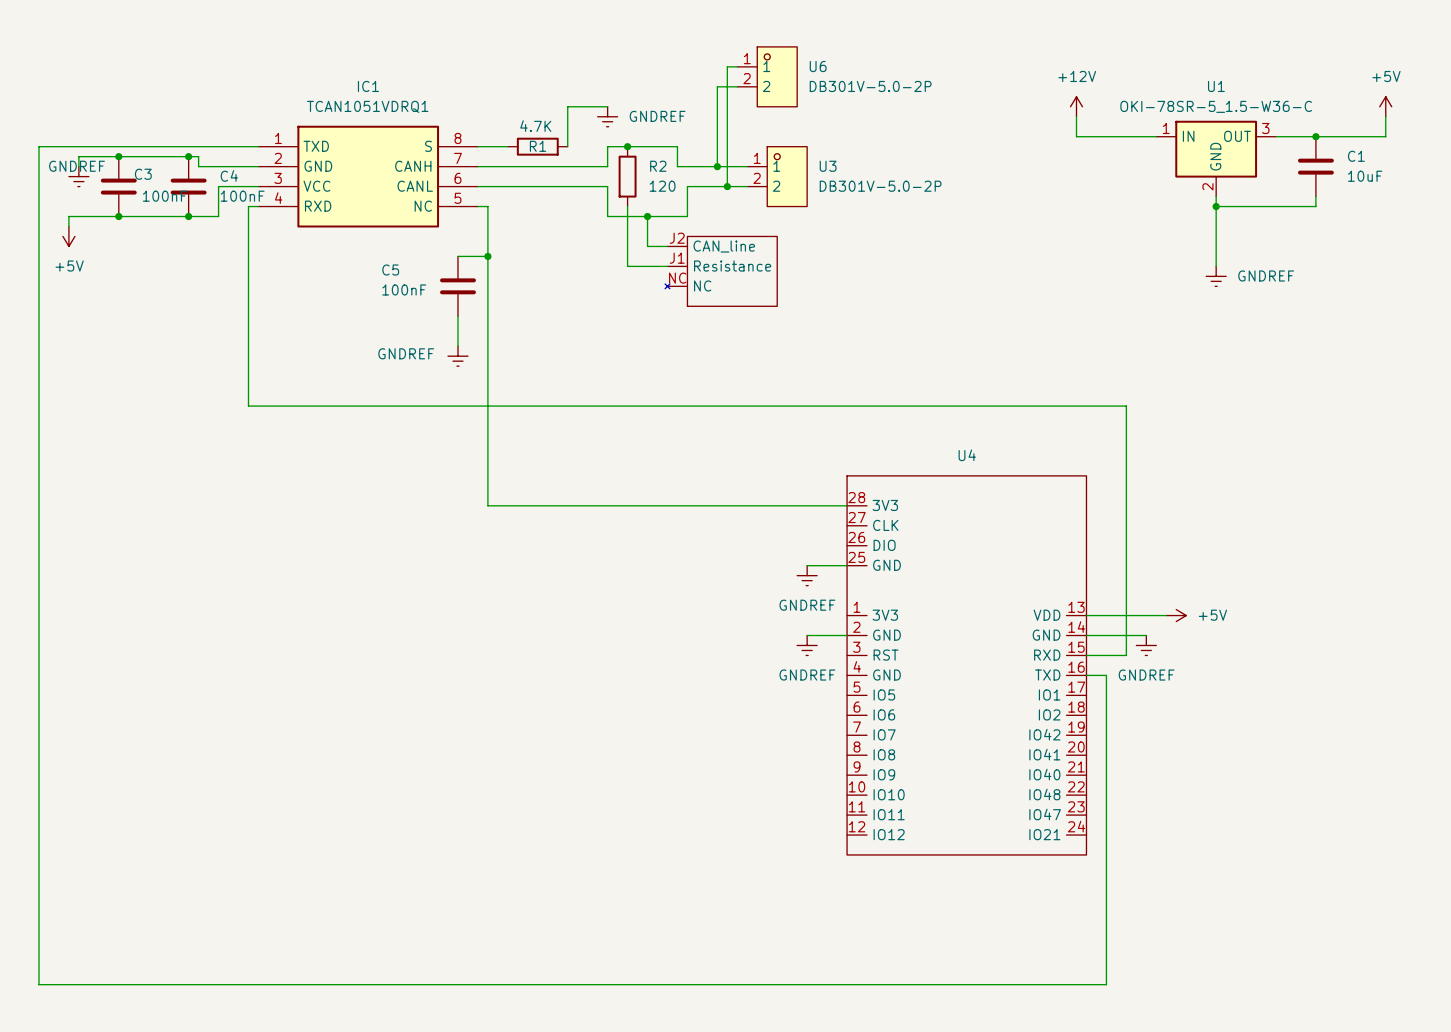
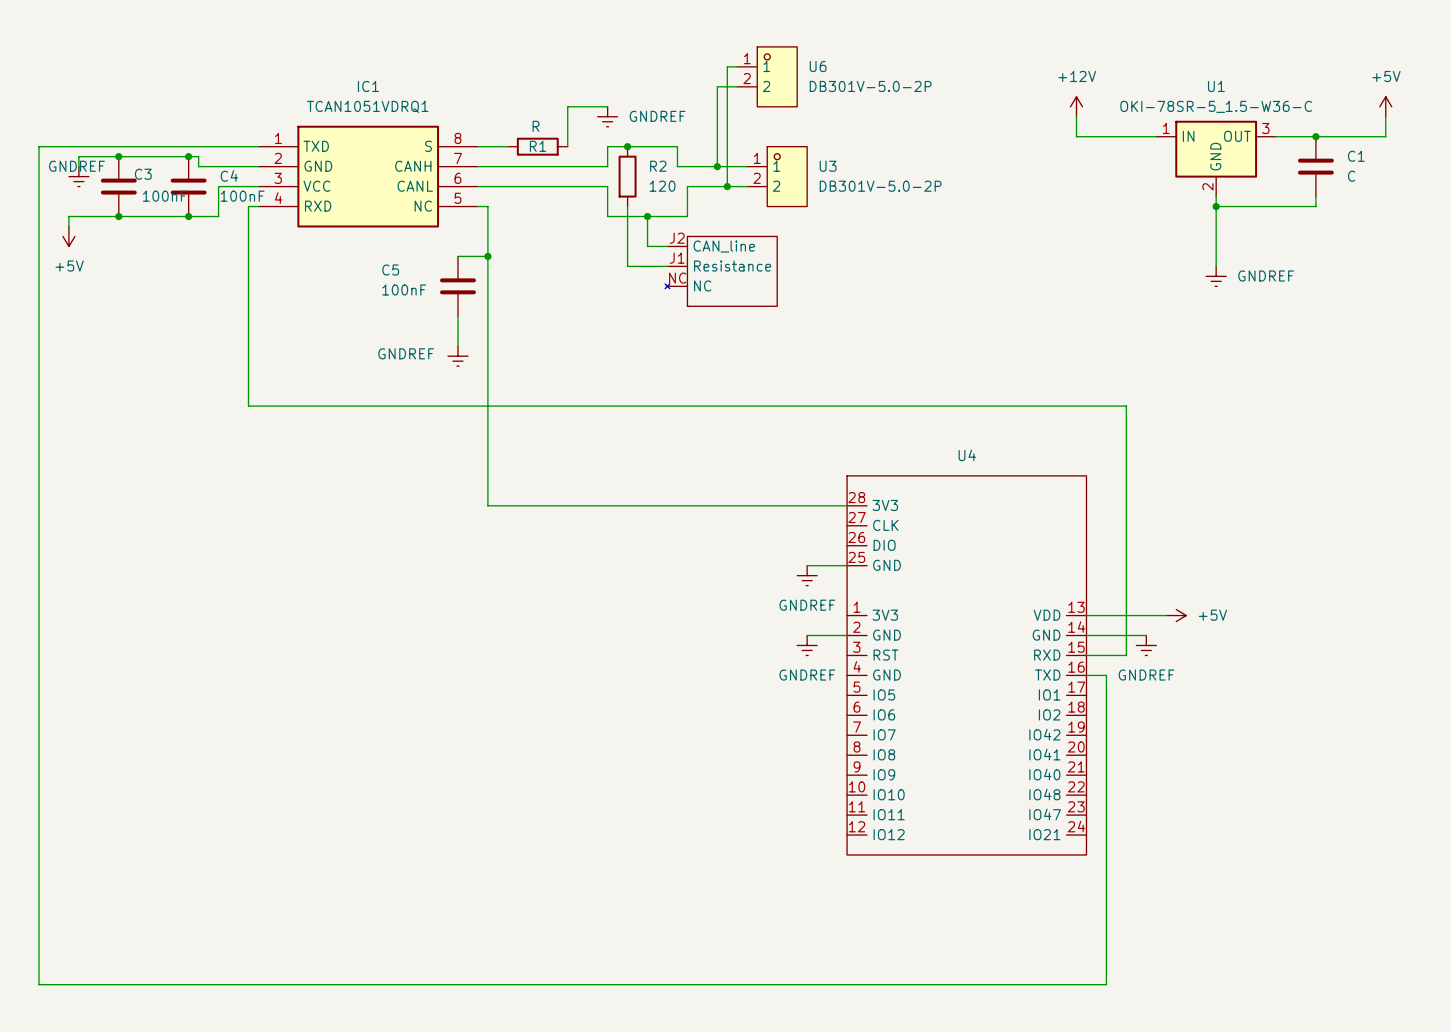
R1 value: 4.7K (535, 126) -> R (536, 126)
C1 value: 10uF (1365, 176) -> C (1351, 176)

